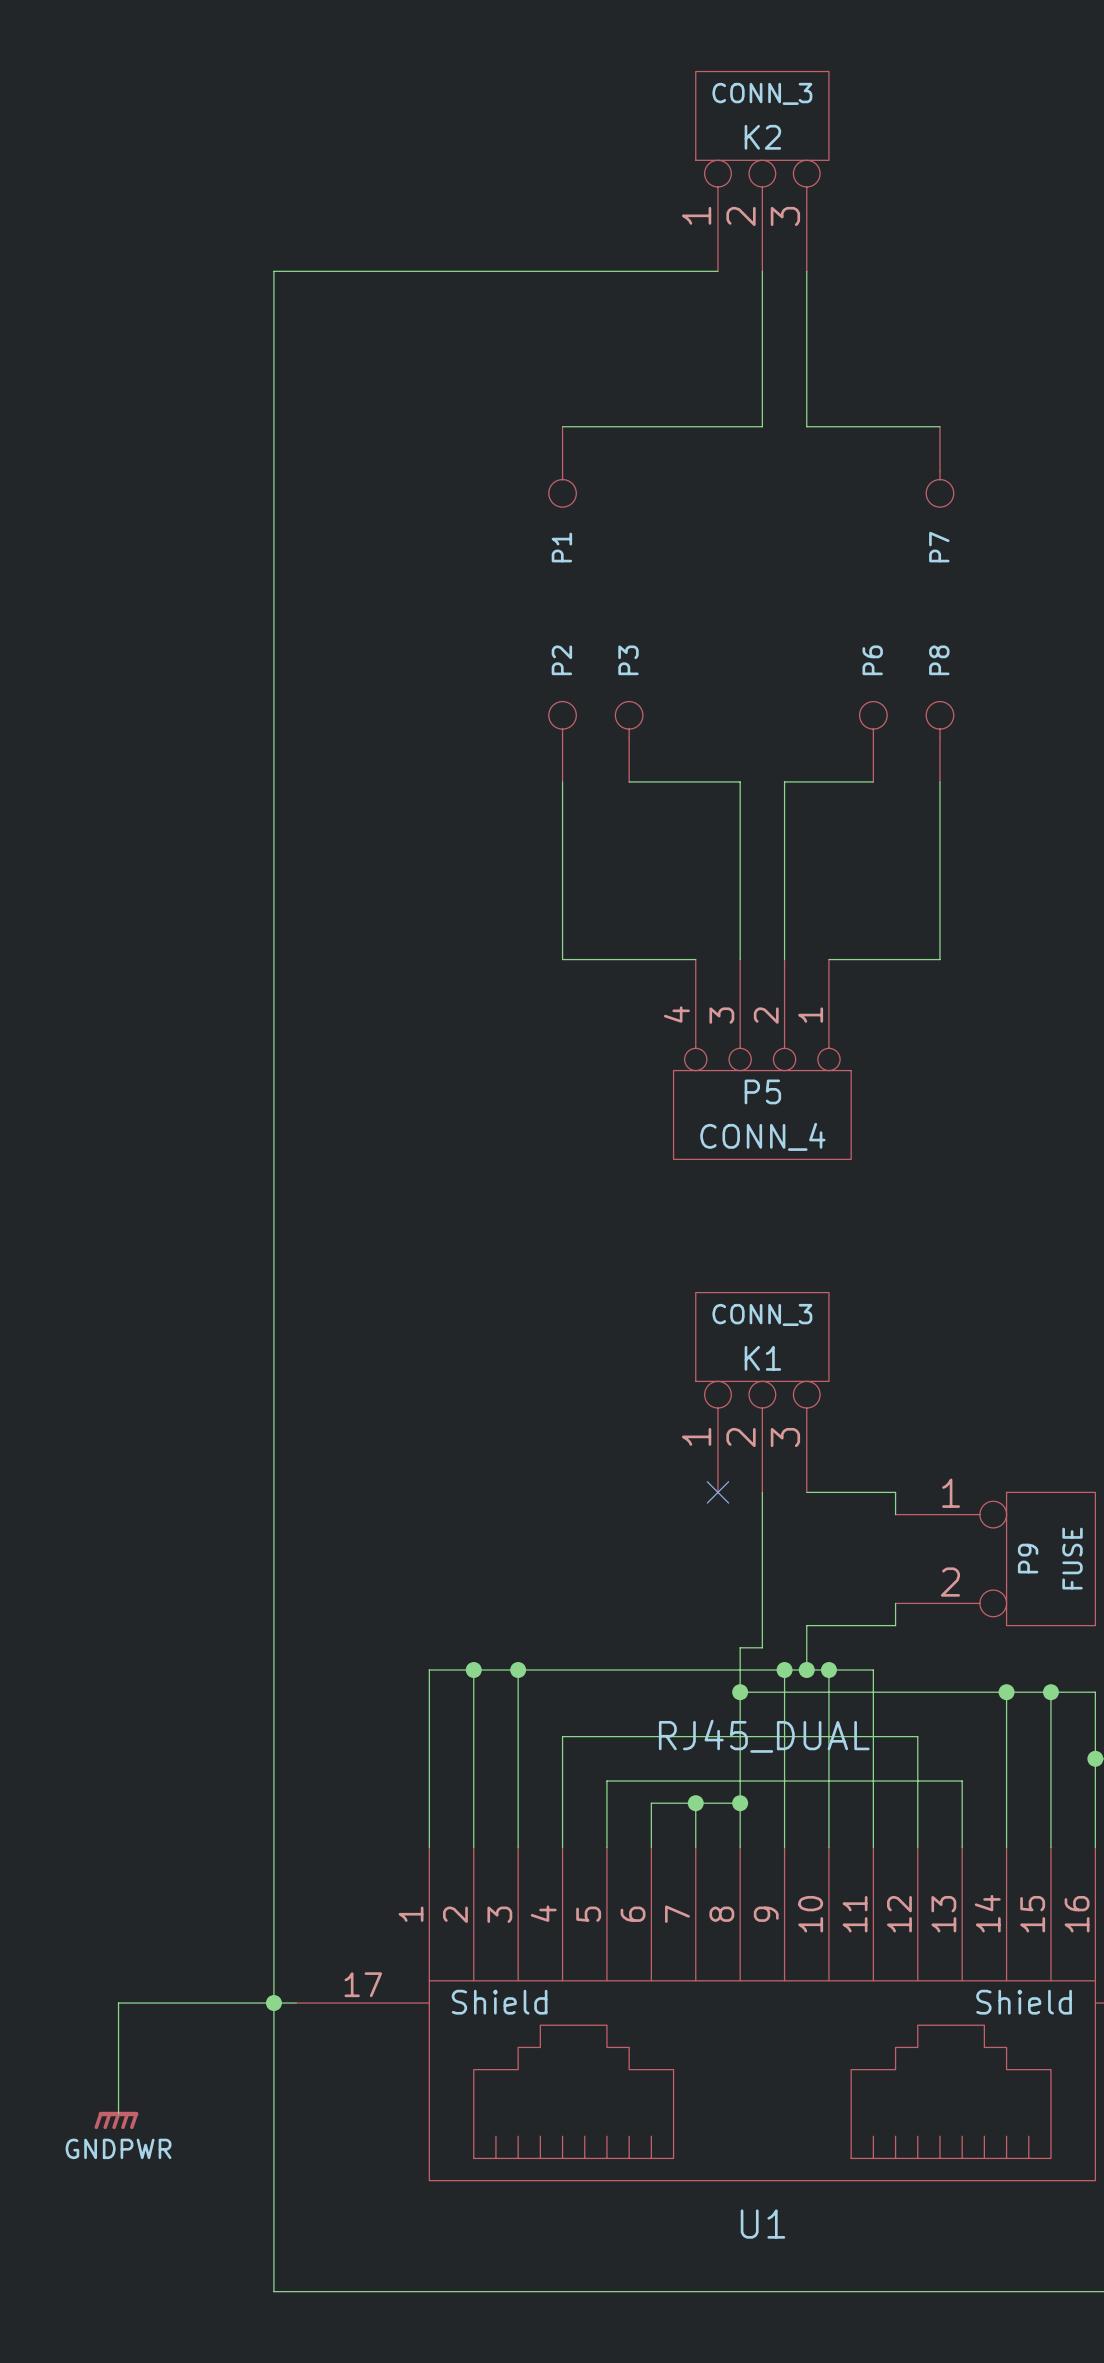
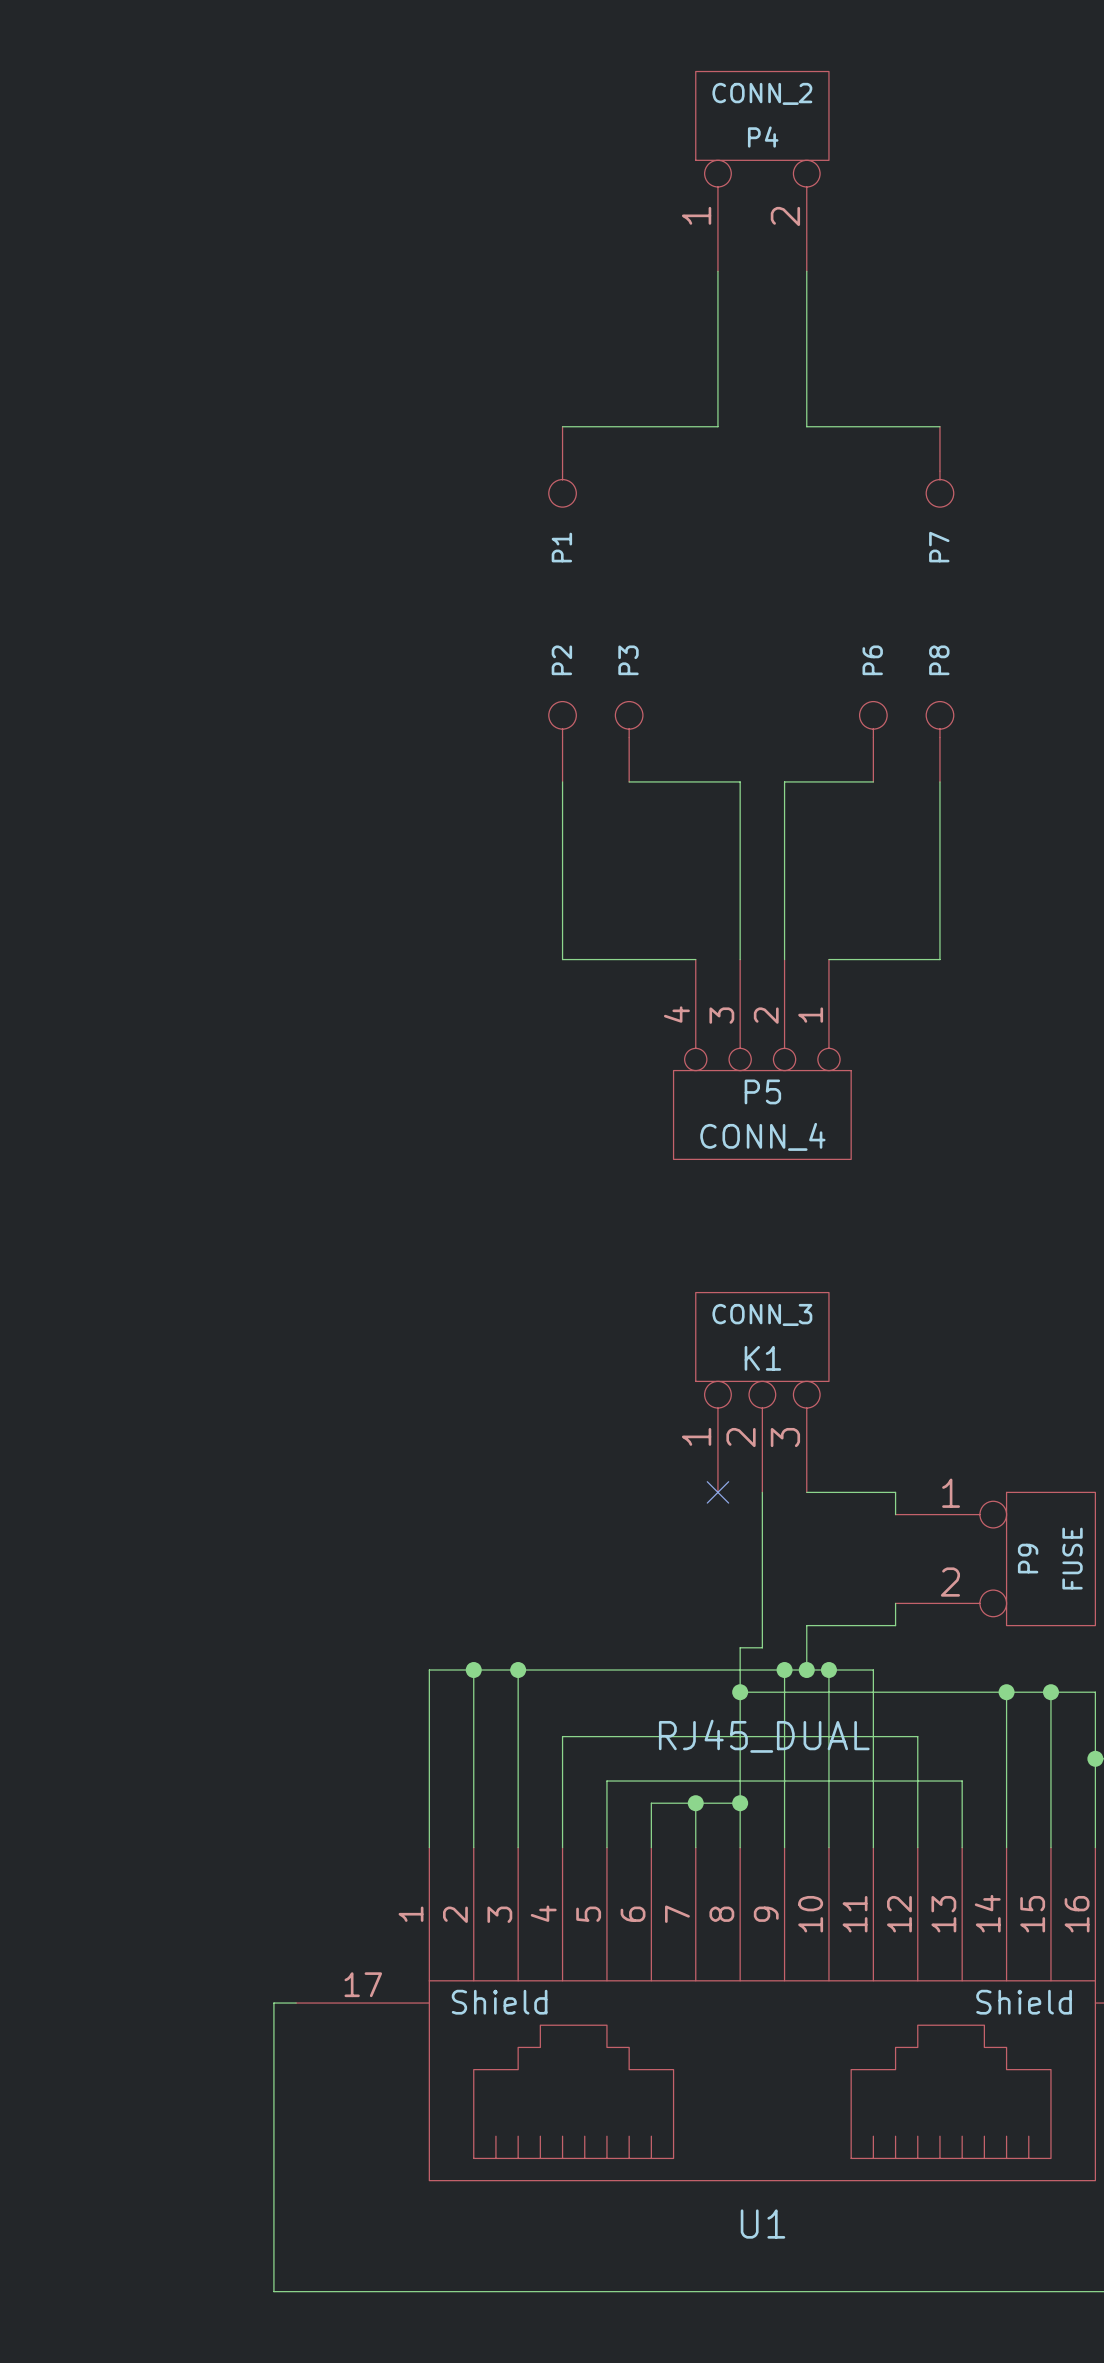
K2: CONN_3 (762, 171) -> none
P4: none -> CONN_2 (762, 171)
wire: (717, 271) (273, 271) (273, 2003) (118, 2003) (118, 2114) -> none
wire: (762, 271) (762, 426) (717, 426) -> (717, 271) (717, 426)
junction: (273, 2003) -> none
power symbol: GNDPWR (116, 2120) -> none

